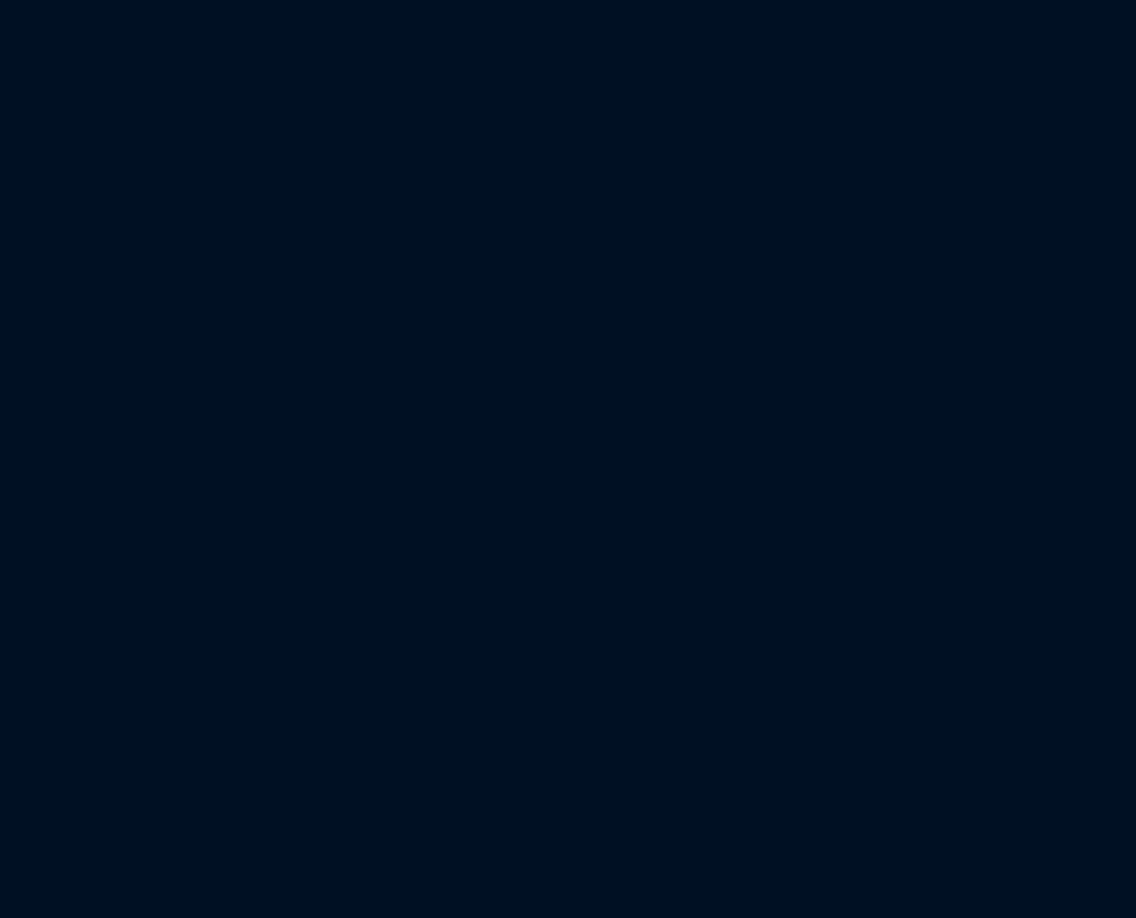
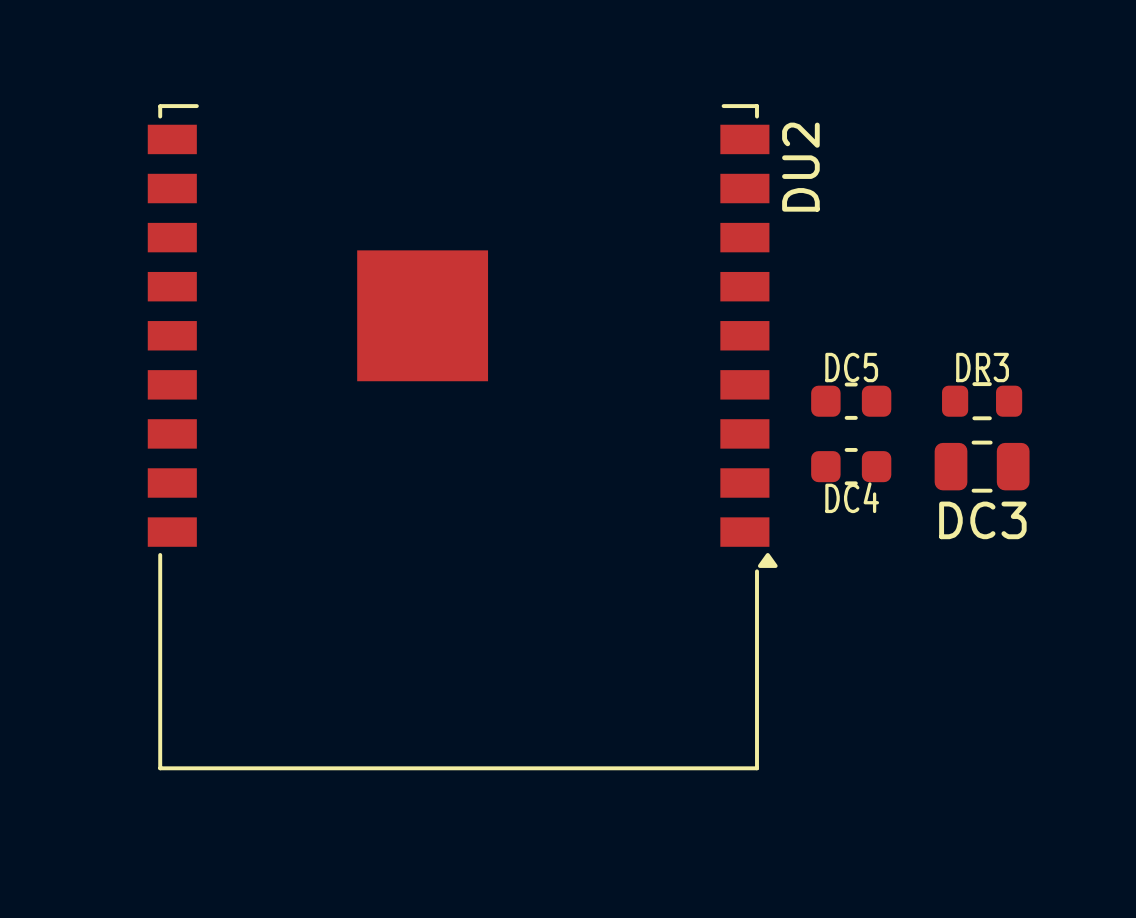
DC5: none -> (851, 401)
DR3: none -> (982, 401)
DU2: none -> (462, 437)
DC4: none -> (851, 466)
DC3: none -> (982, 466)

